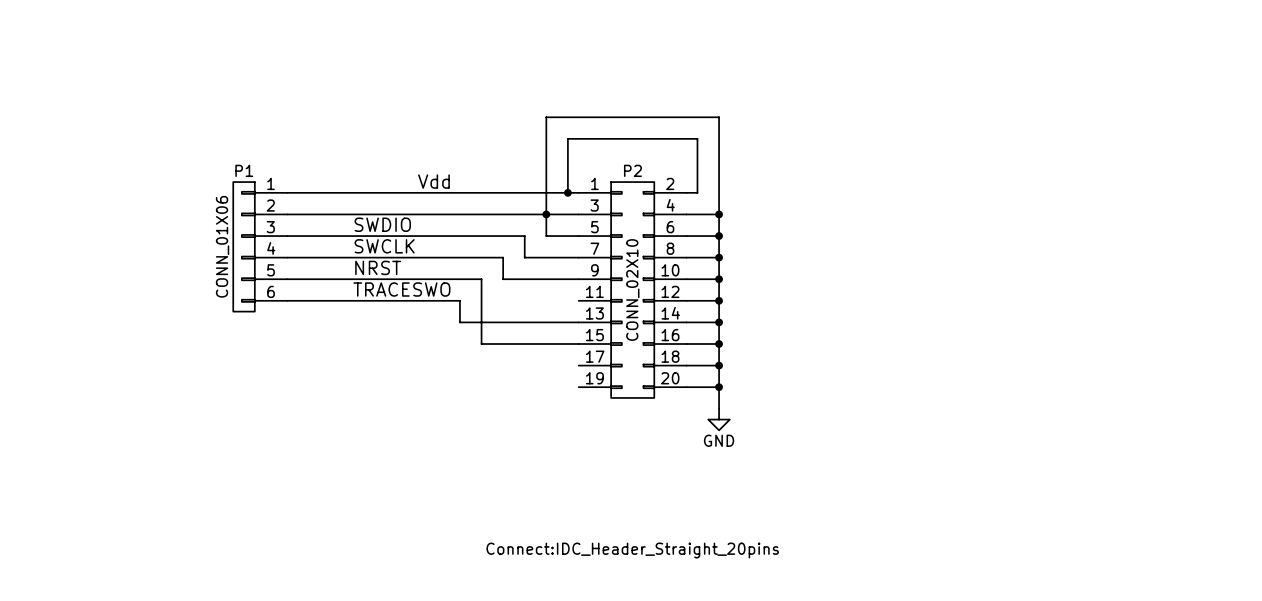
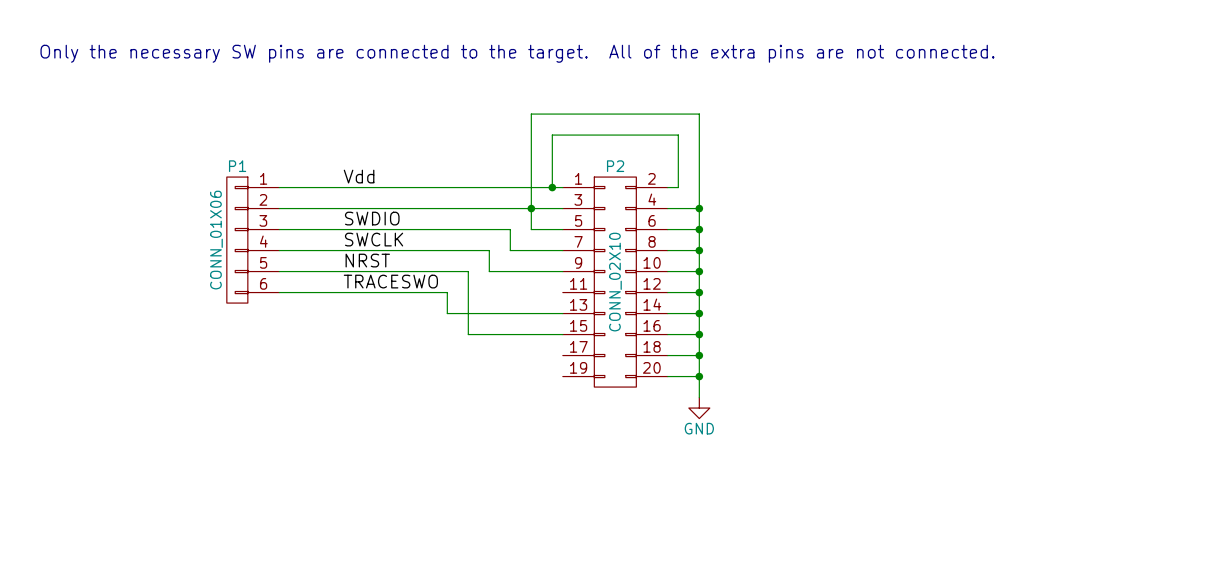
text: none -> Only the necessary SW pins are connected to the target. All of the extra pins are not connected. (517, 53)
label position: Vdd (433, 181) -> Vdd (359, 176)
P2 text: Connect:IDC_Header_Straight_20pins (632, 550) -> none

